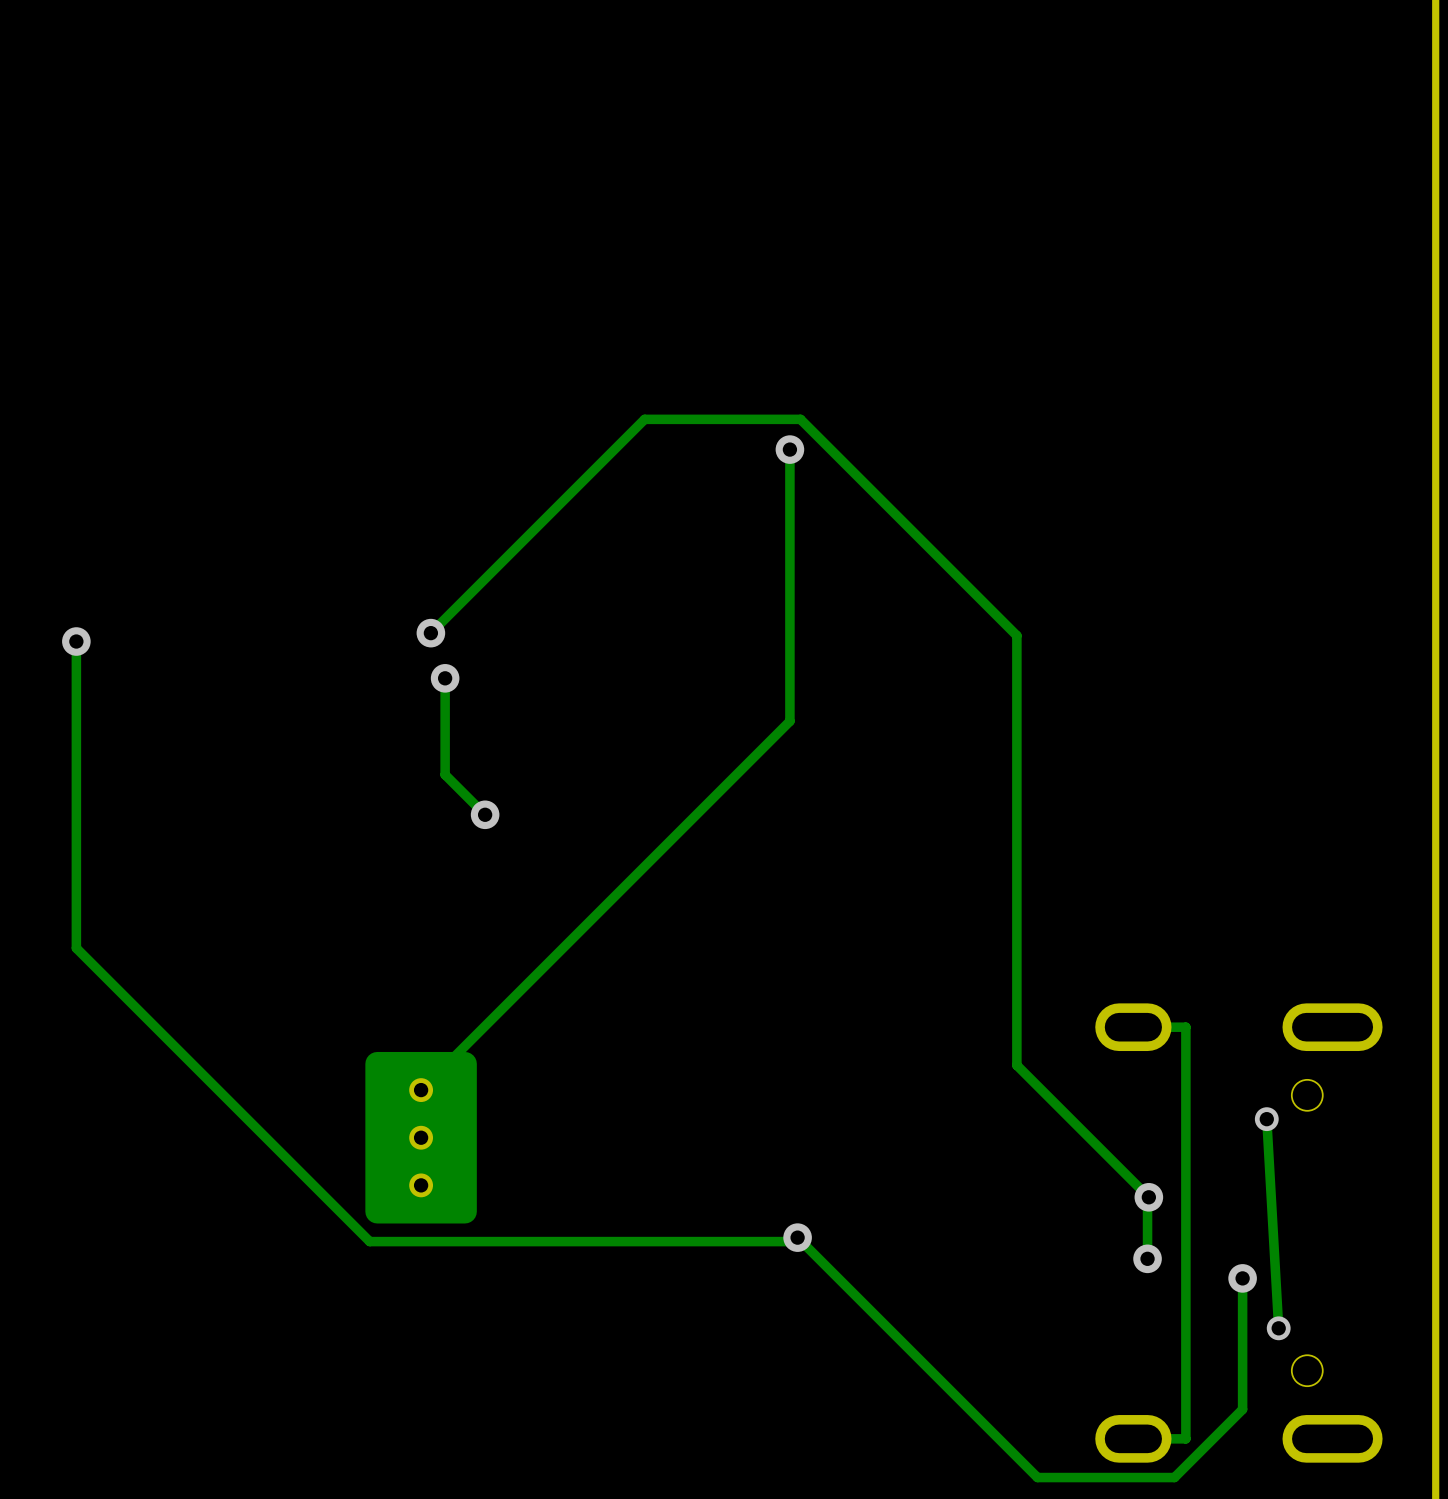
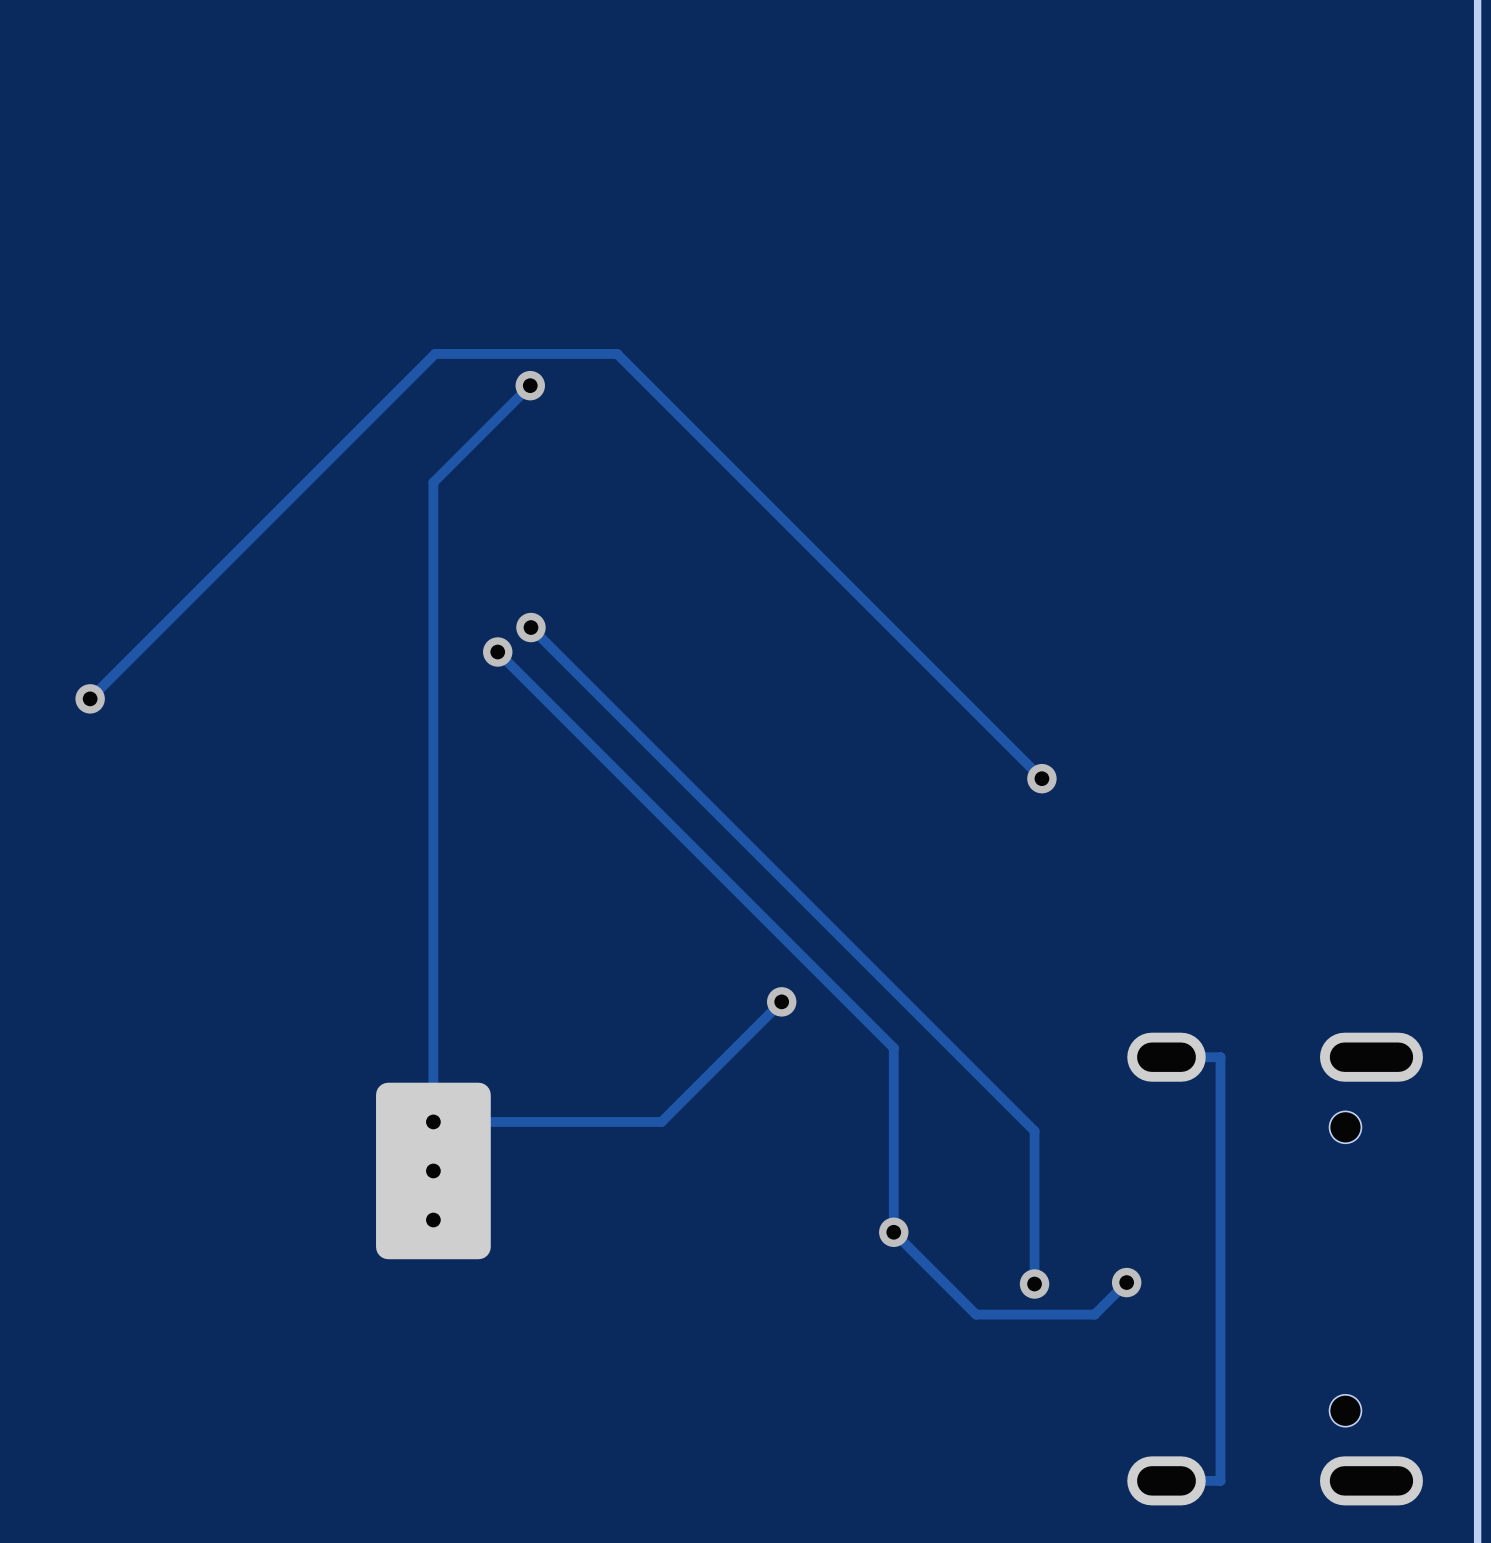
track: none -> (530, 385) (433, 482) (433, 1121) (661, 1121) (781, 1001)
via: none -> (530, 385)
track: (789, 449) (789, 721) (421, 1090) -> none
via: (789, 449) -> none
track: none -> (530, 627) (1034, 1131) (1034, 1284)
via: none -> (530, 627)
track: (430, 633) (644, 419) (800, 419) (1016, 635) (1016, 1065) (1148, 1197) (1147, 1258) -> none
via: (430, 633) -> none
track: none -> (497, 652) (893, 1048) (893, 1232) (976, 1314) (1094, 1314) (1126, 1282)
via: none -> (497, 652)
track: (76, 641) (76, 948) (369, 1241) (793, 1241) (797, 1237) (1037, 1477) (1174, 1477) (1242, 1409) (1242, 1278) -> none
via position: (76, 641) -> (90, 698)
track: (445, 678) (445, 774) (485, 814) -> none
via: (445, 678) -> none
track: none -> (90, 698) (435, 353) (617, 353) (1041, 778)
via: none -> (1041, 778)
via: (485, 814) -> none
via: none -> (781, 1001)
track: (1266, 1119) (1278, 1328) -> none
via: (1266, 1119) -> none
via: (1148, 1197) -> none
via position: (797, 1237) -> (893, 1232)
via: none -> (1126, 1282)
via: none -> (1034, 1284)
via: (1147, 1258) -> none
via: (1242, 1278) -> none
via: (1278, 1328) -> none

